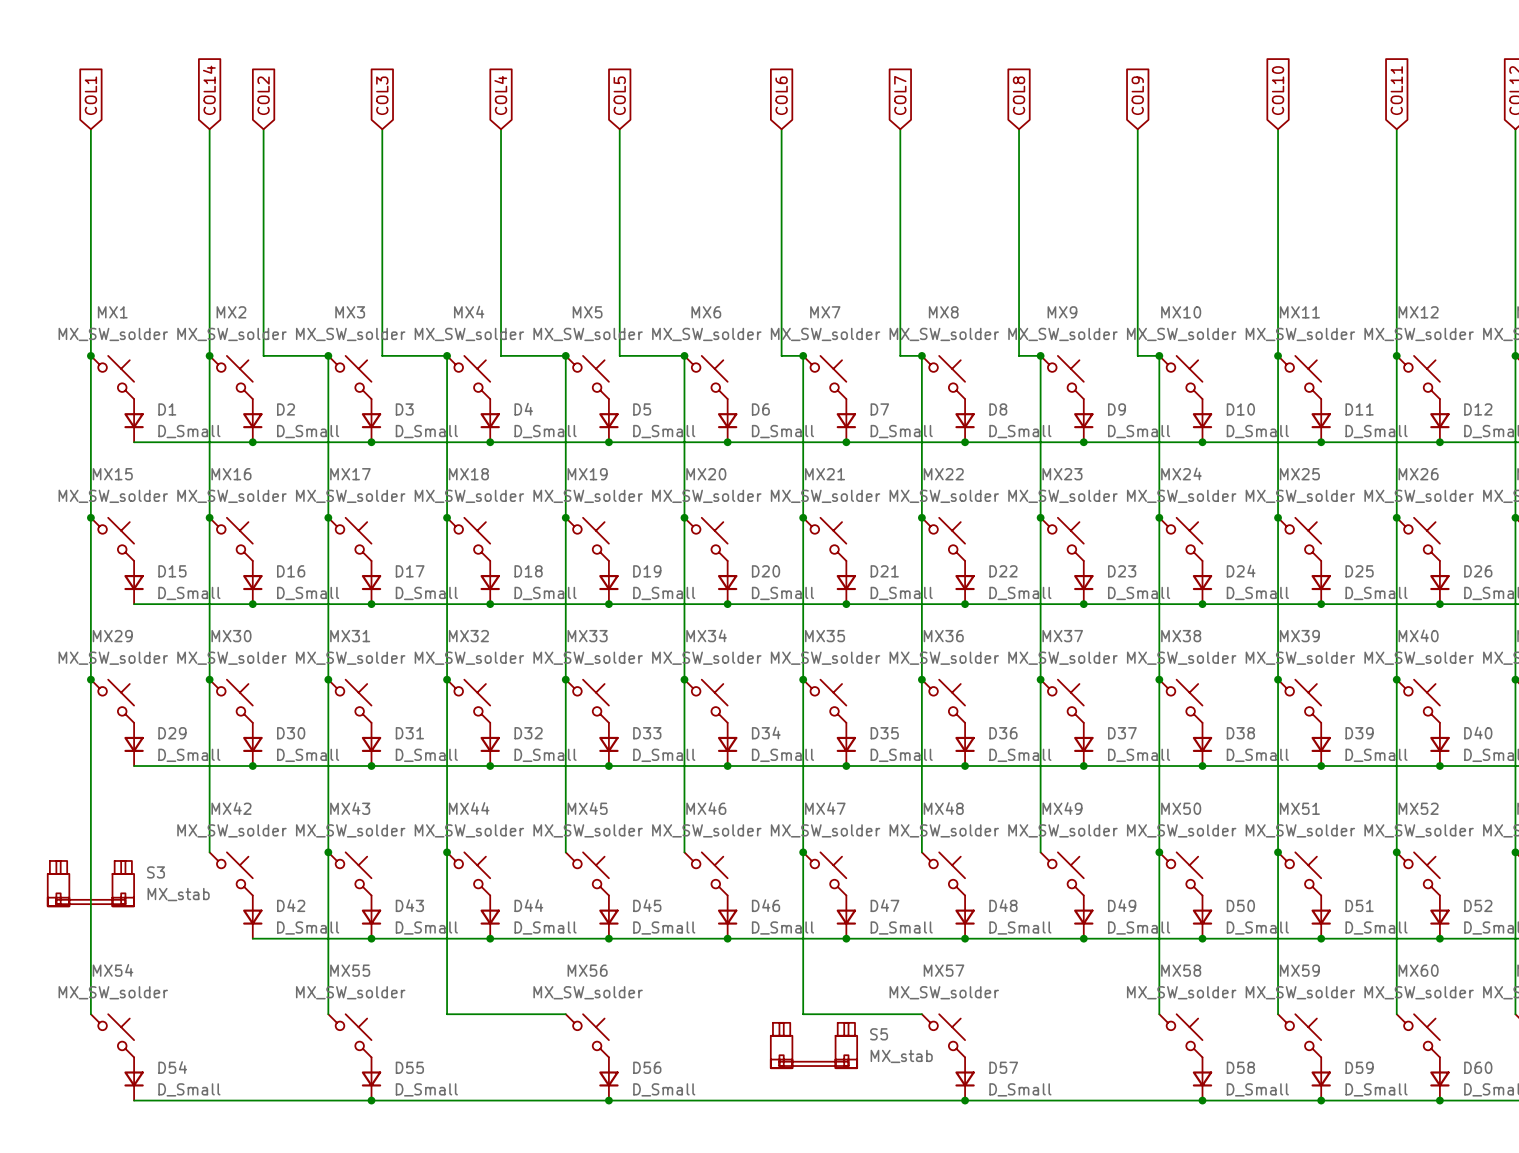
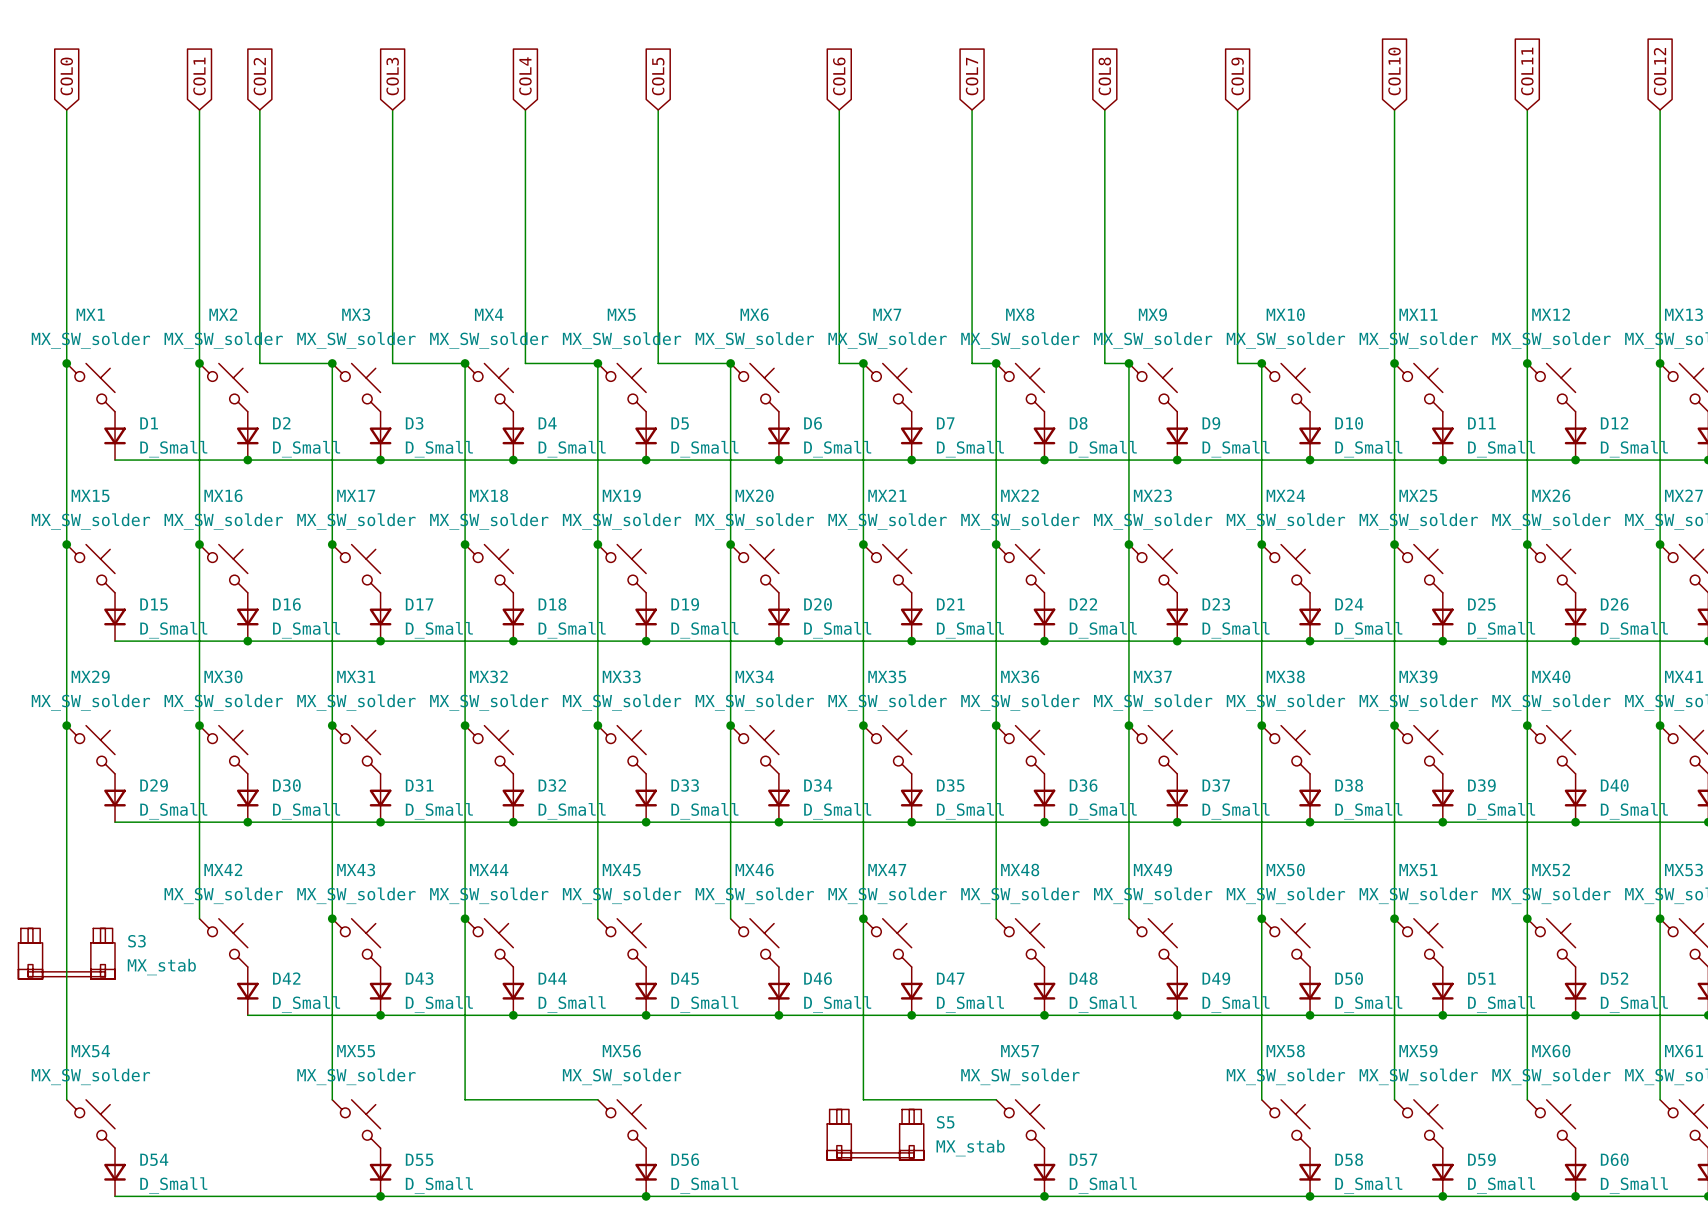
global label: COL14 (209, 90) -> COL1 (199, 76)
global label: COL1 (90, 95) -> COL0 (66, 76)

